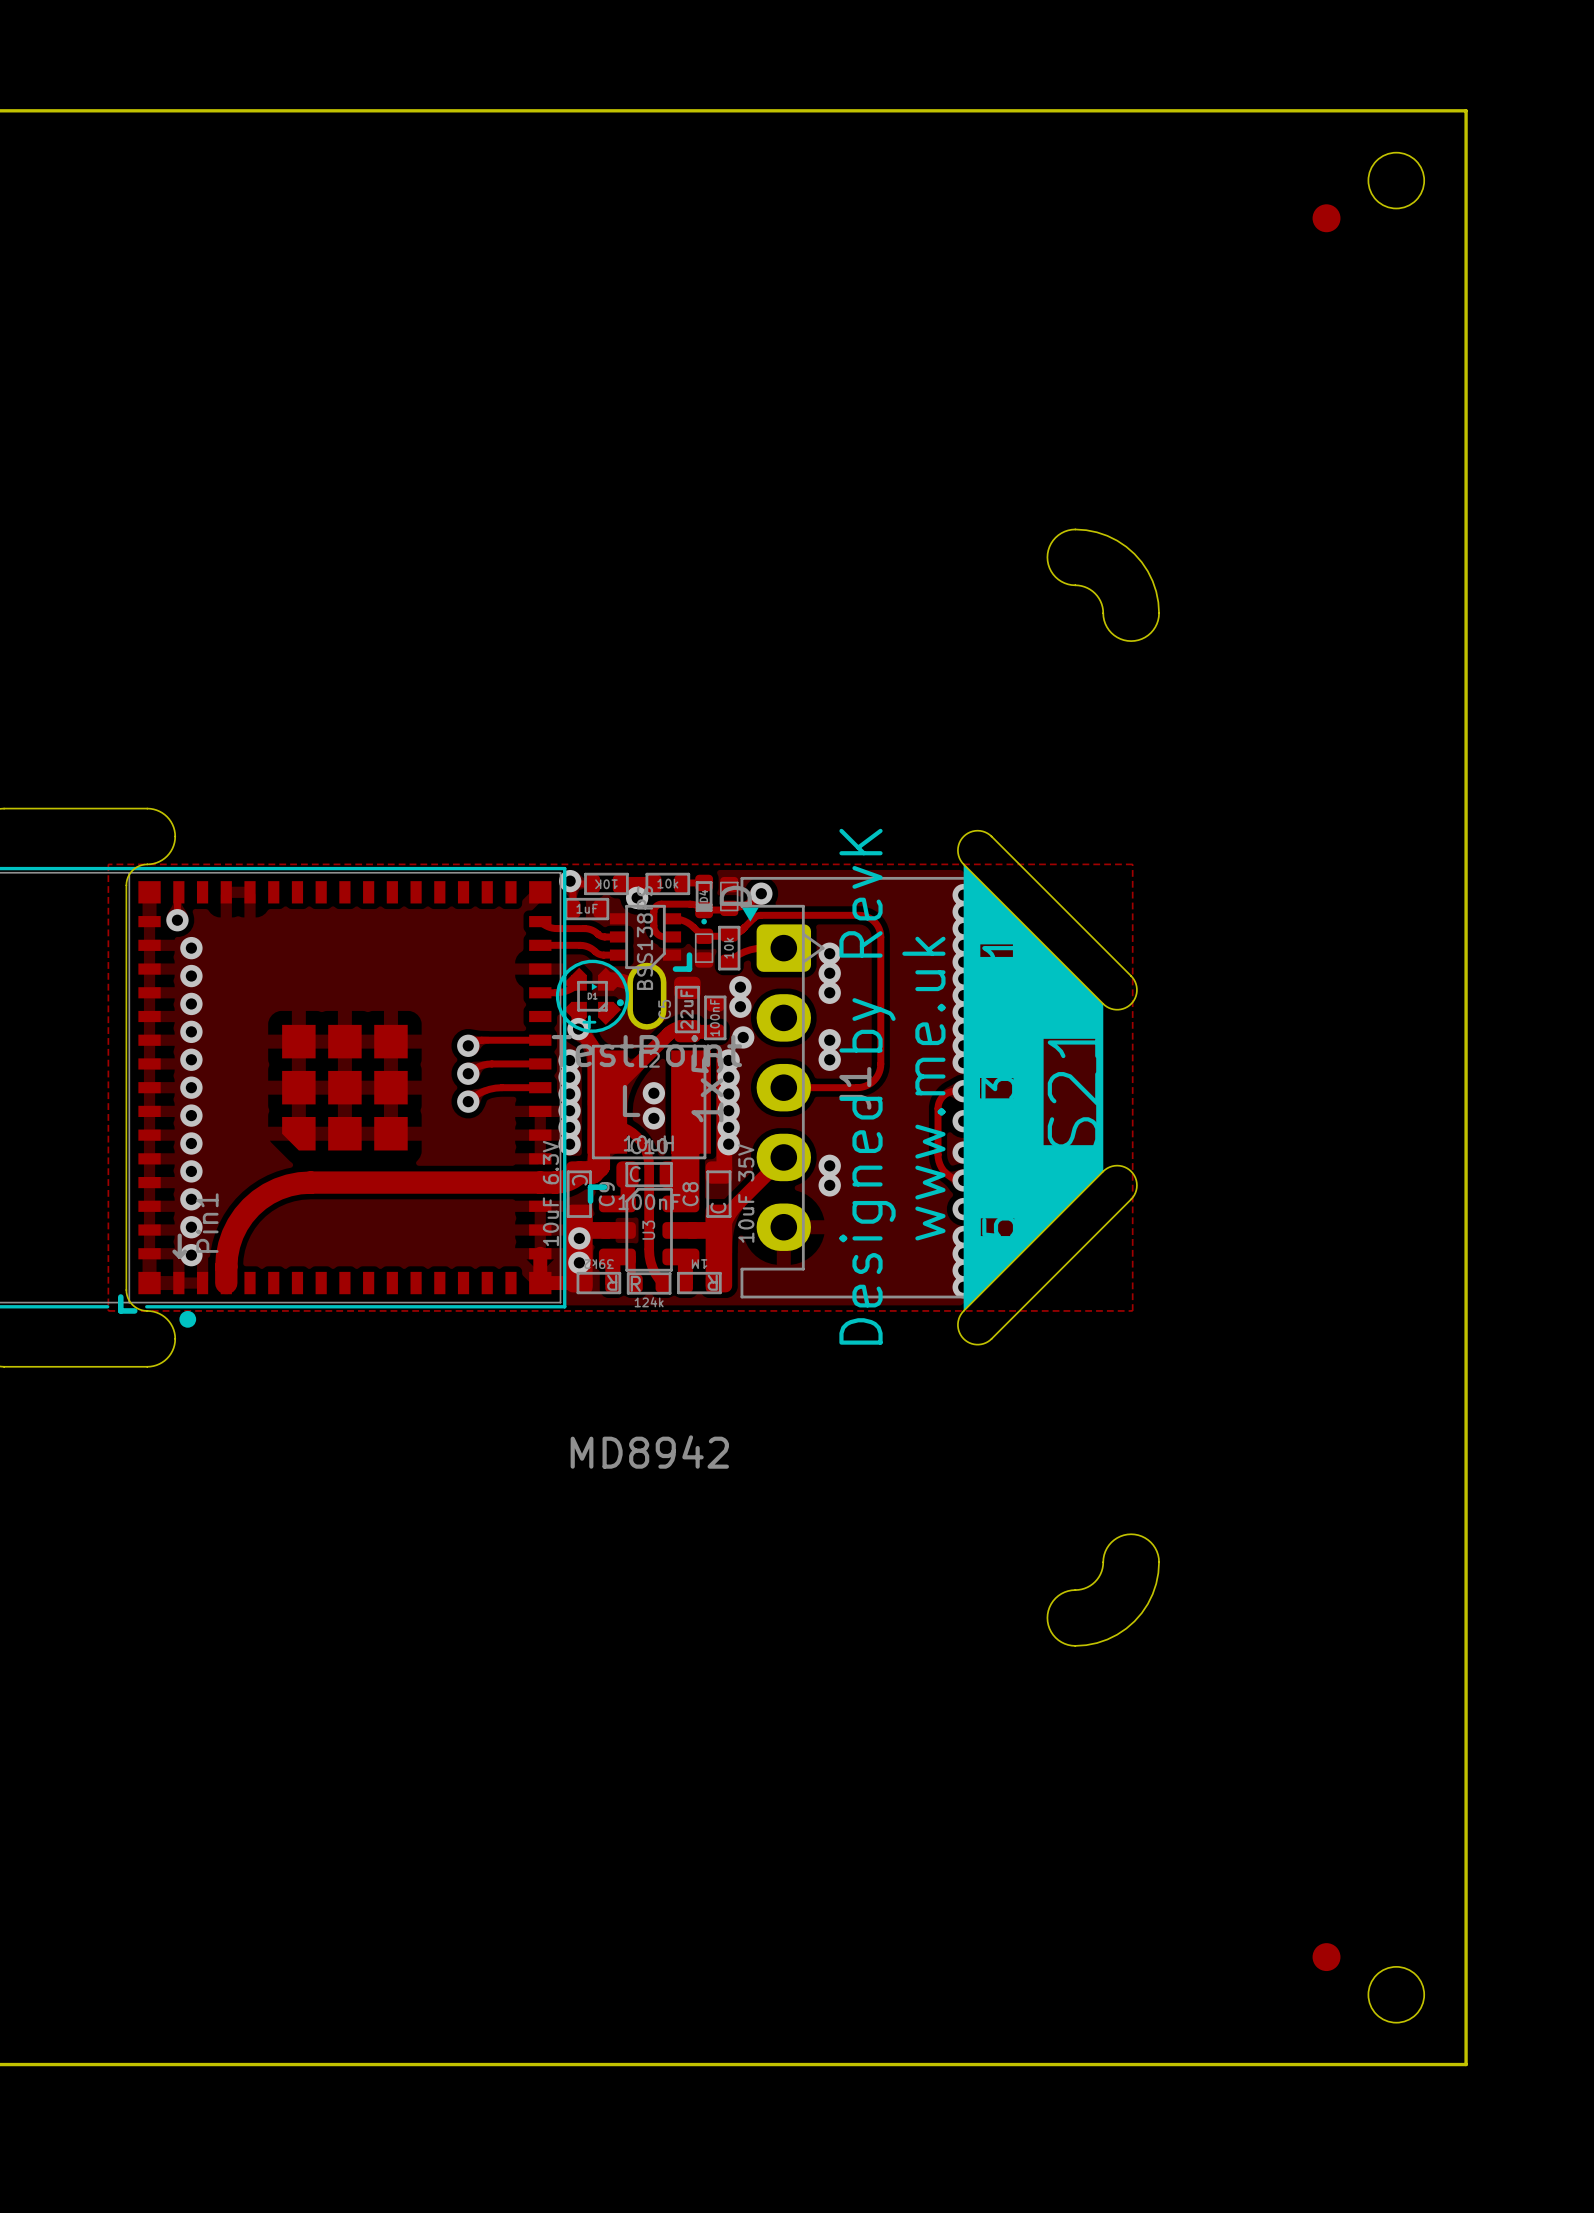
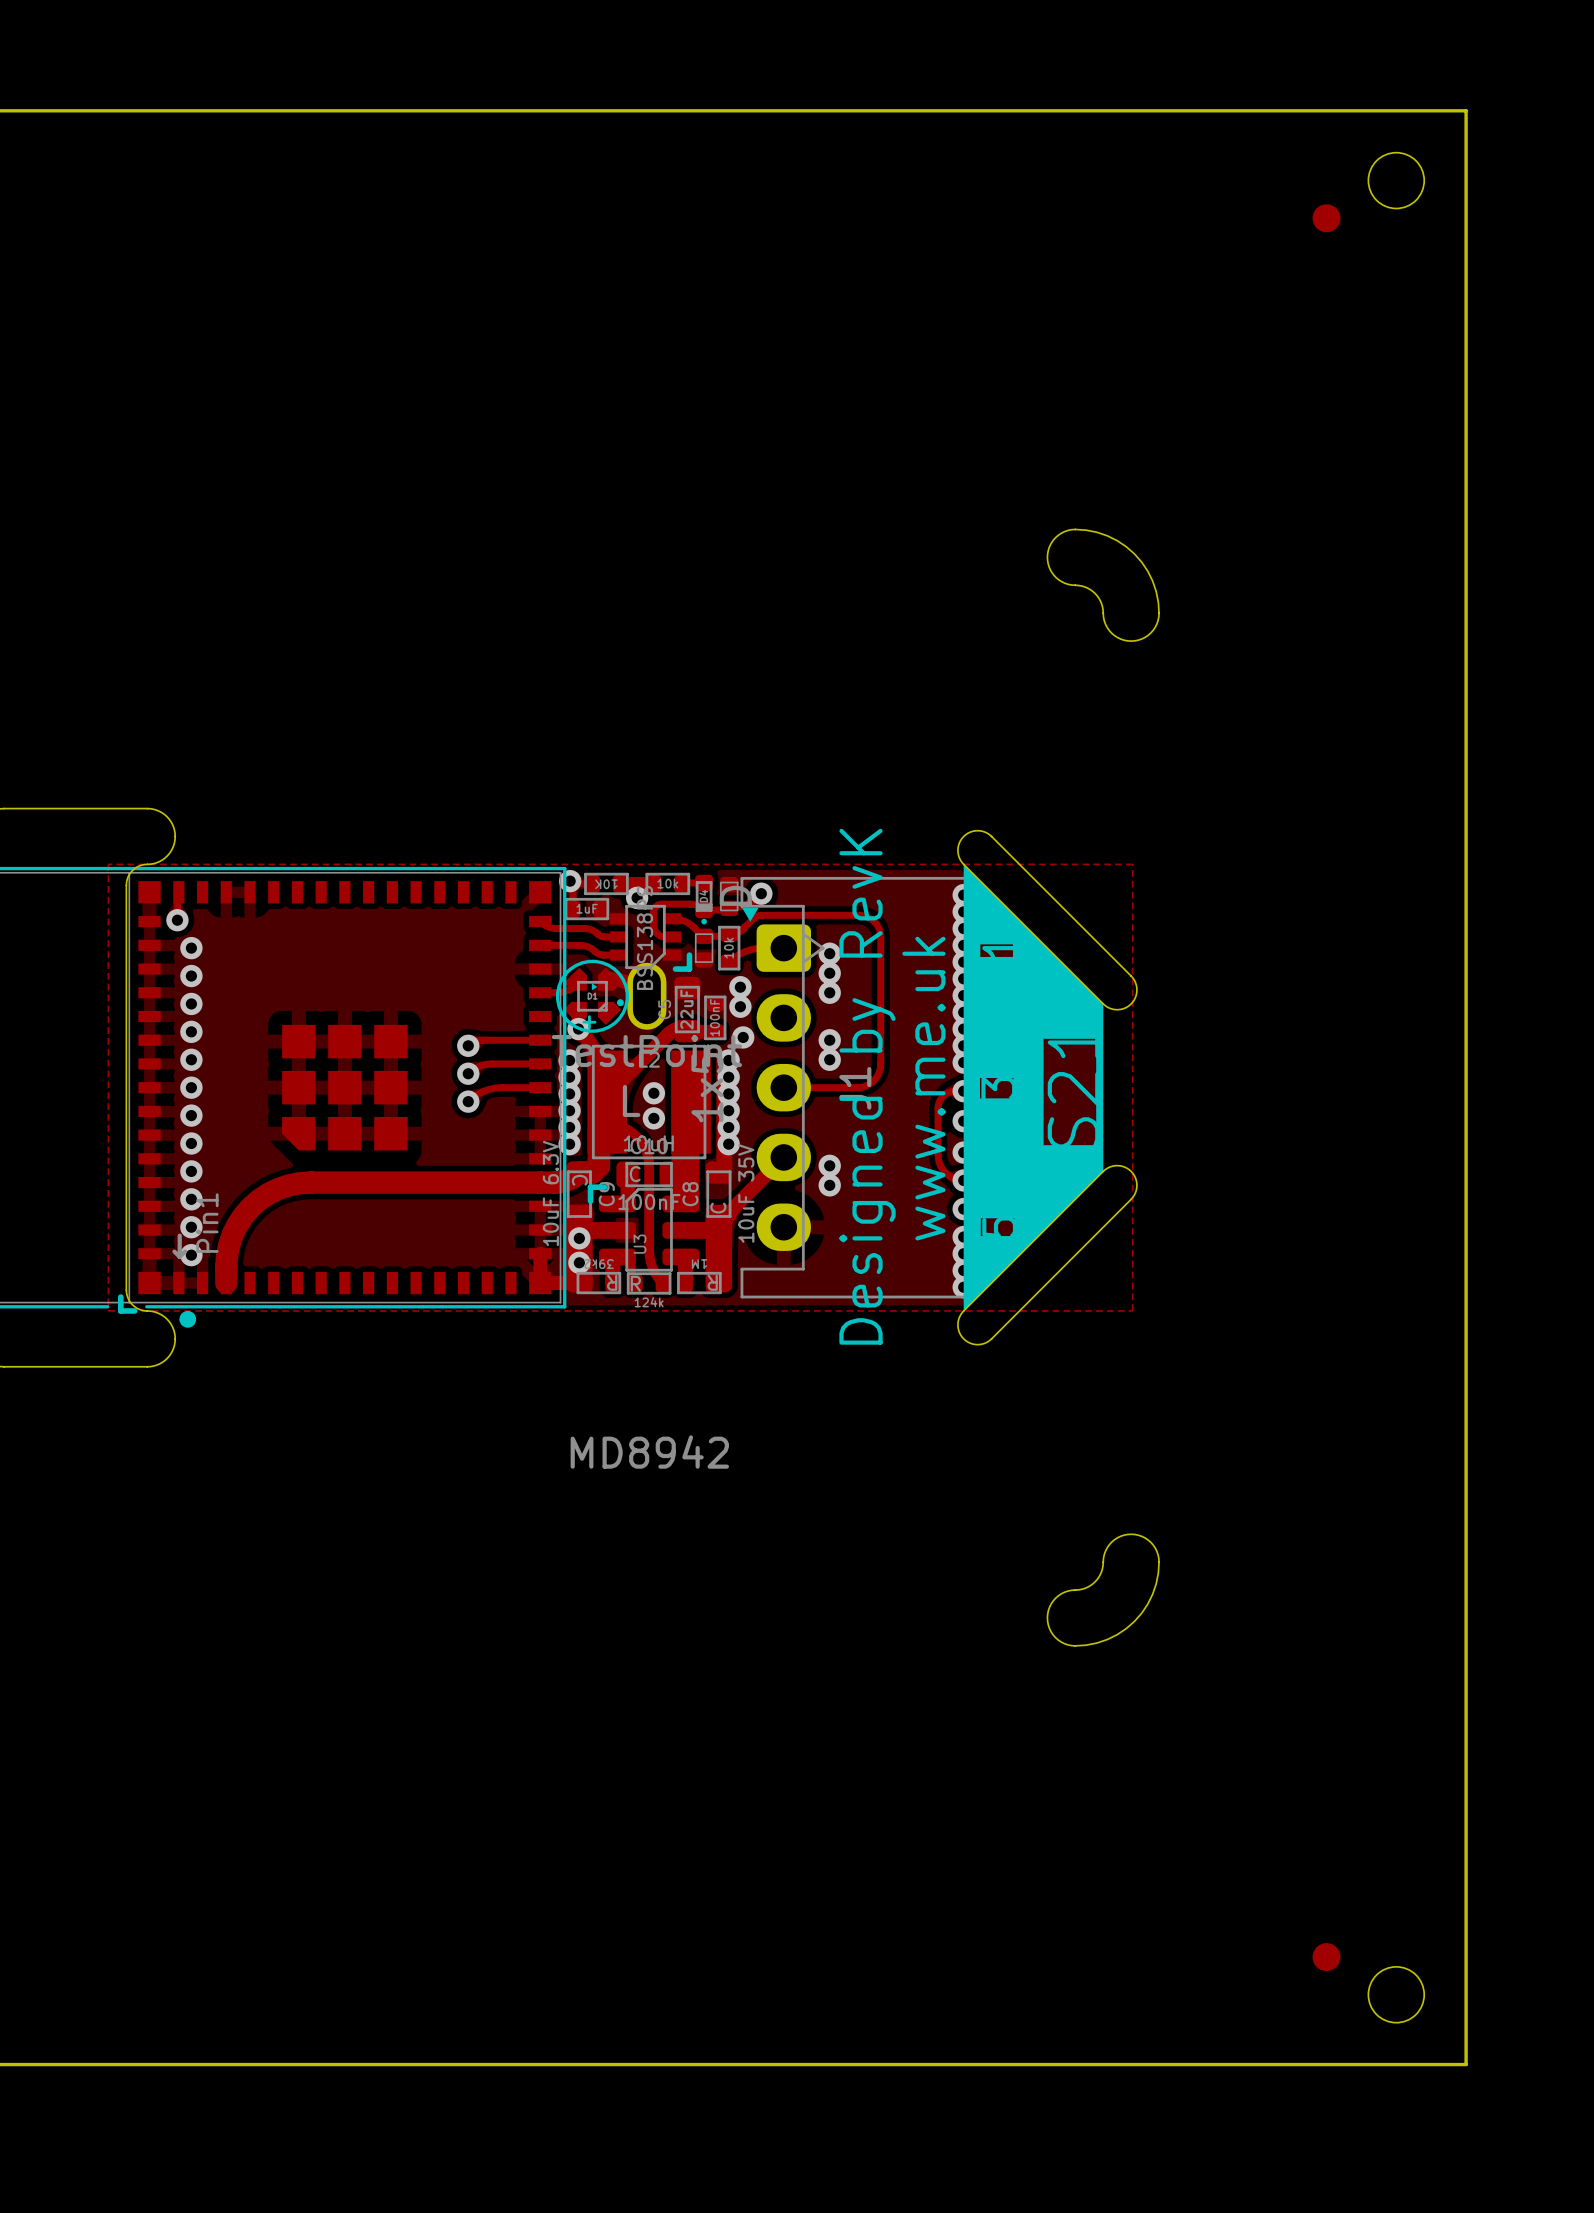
U3 name position: U3 (648, 1230) -> U3 (640, 1244)

